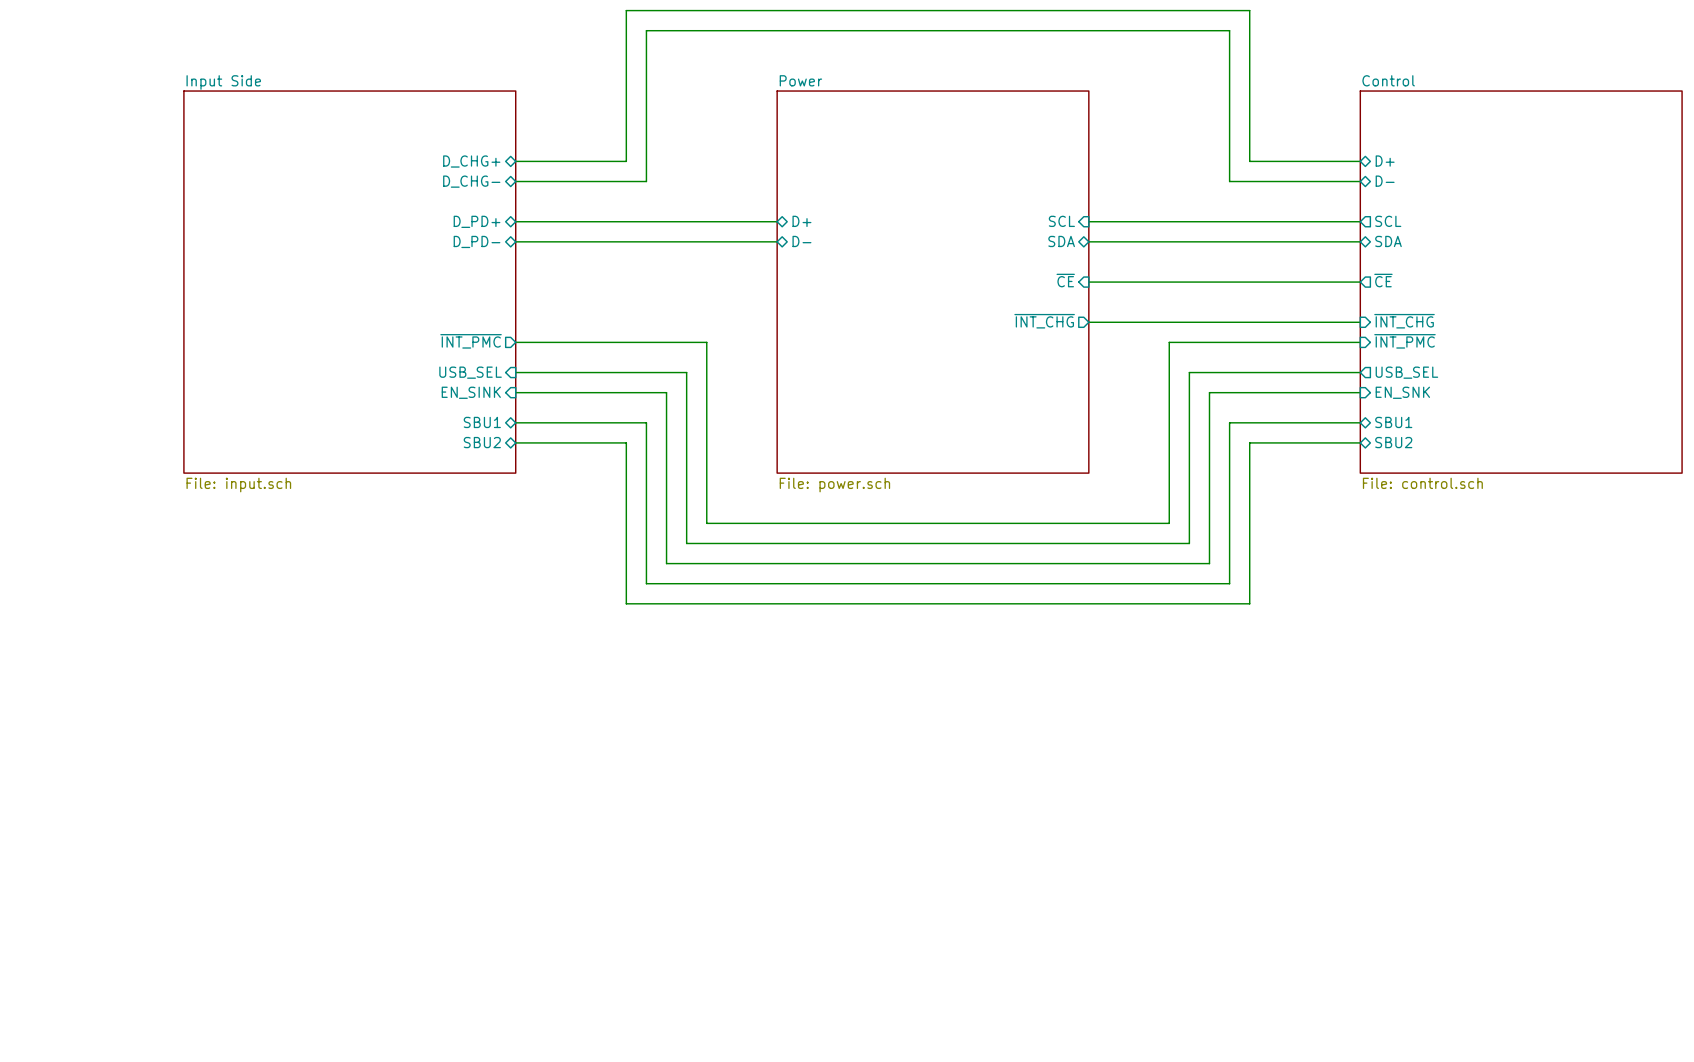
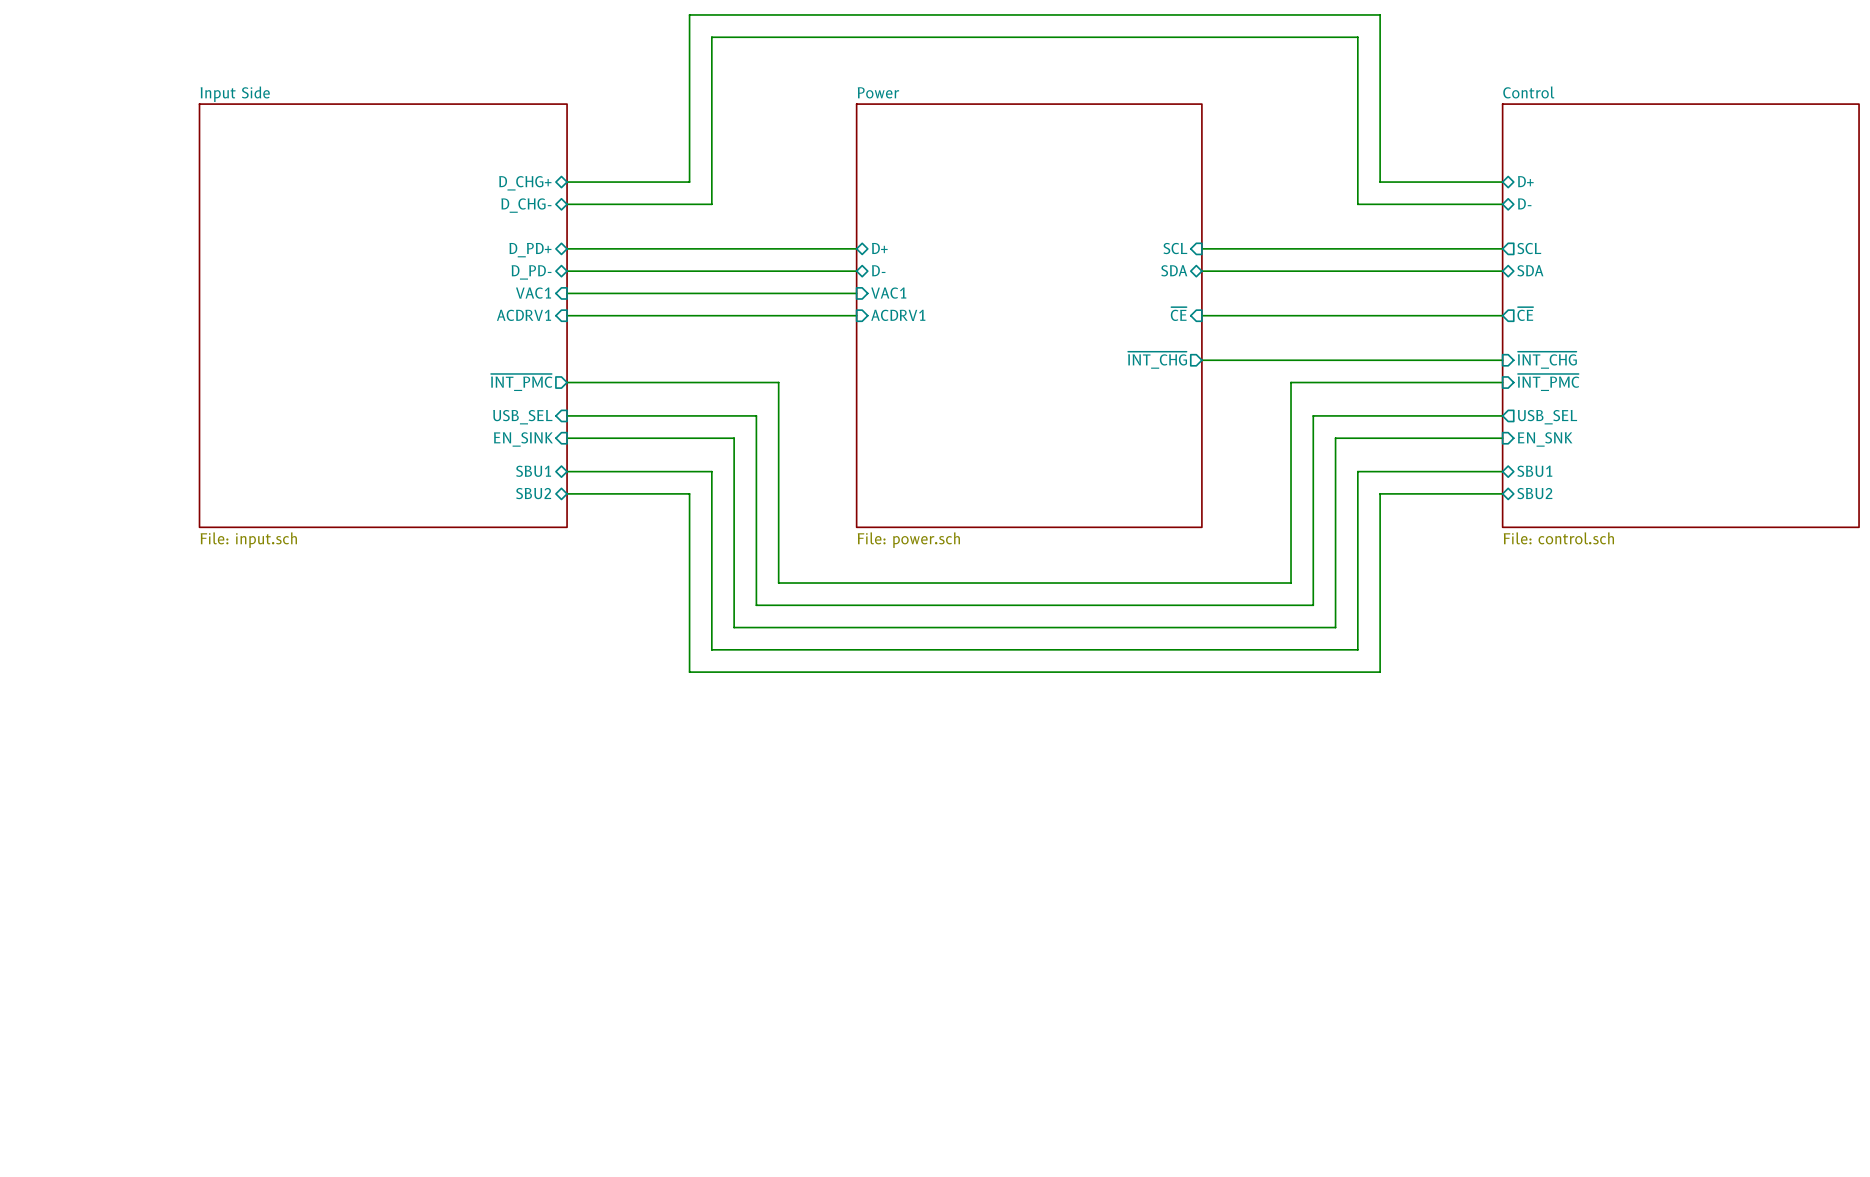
sheet pin: none -> VAC1 (533, 293)
wire: none -> (567, 293) (856, 293)
sheet pin: none -> VAC1 (888, 293)
sheet pin: none -> ACDRV1 (524, 315)
sheet pin: none -> ACDRV1 (898, 315)
wire: none -> (567, 315) (856, 315)

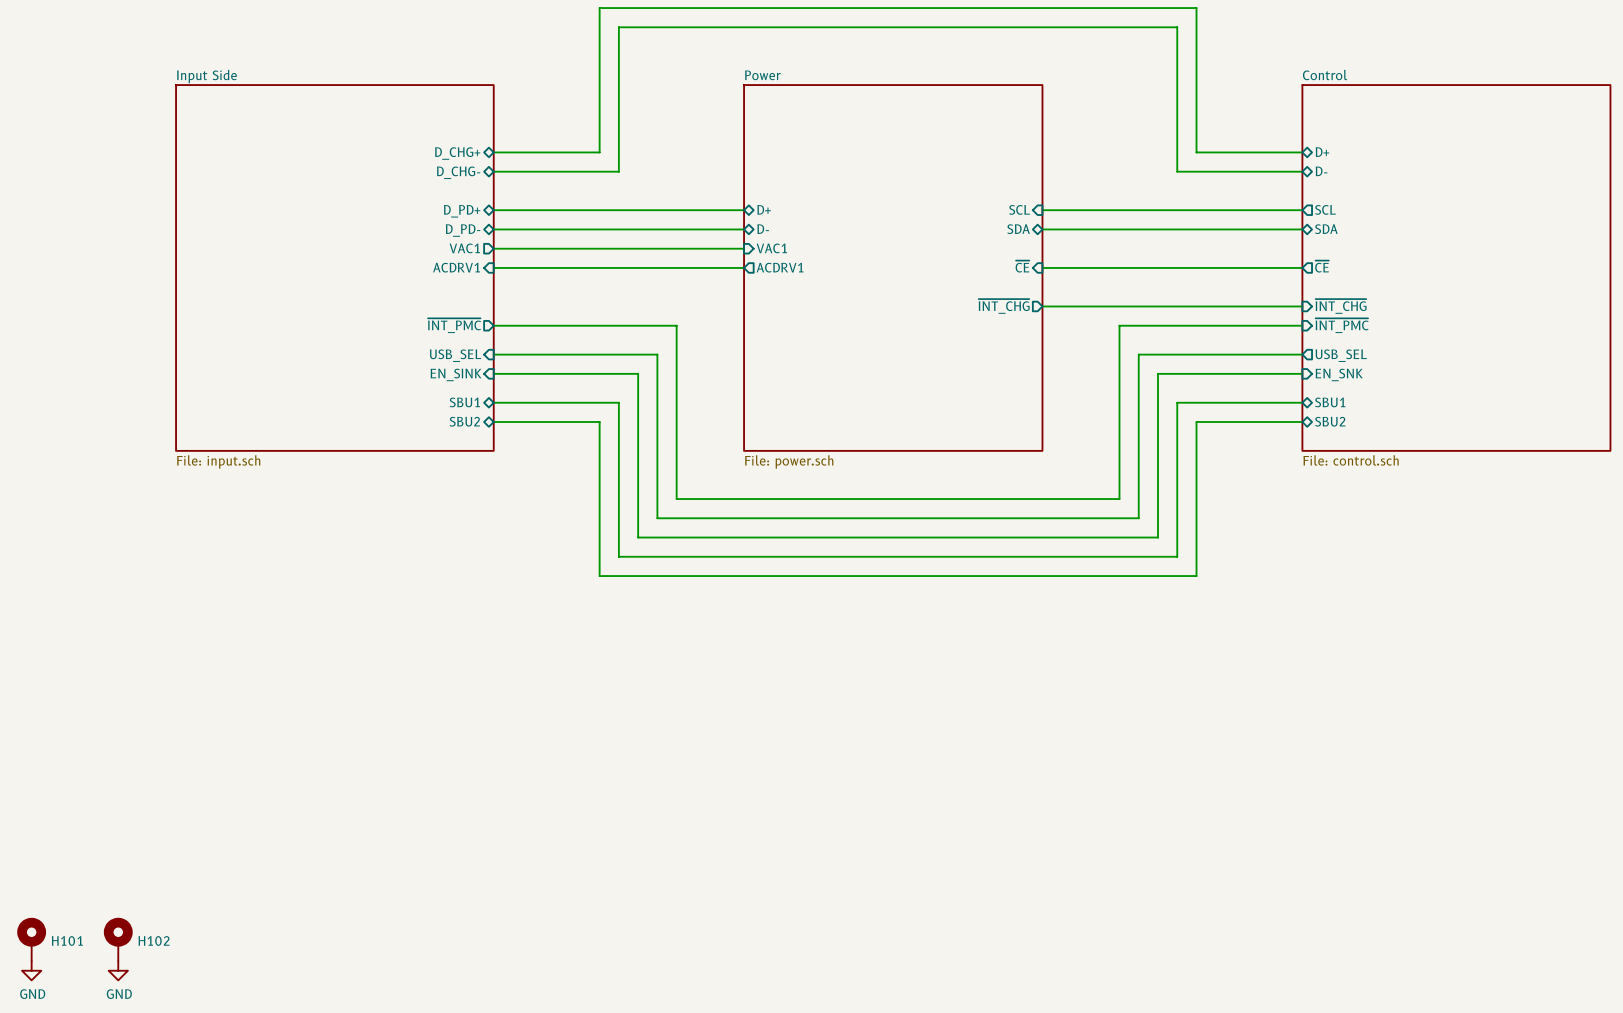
sheet pin shape: input (533, 293) -> output (464, 248)
sheet pin shape: input (898, 315) -> output (780, 267)
H101: none -> (31, 939)
H102: none -> (118, 939)
power symbol: none -> GND (31, 970)
power symbol: none -> GND (118, 970)

